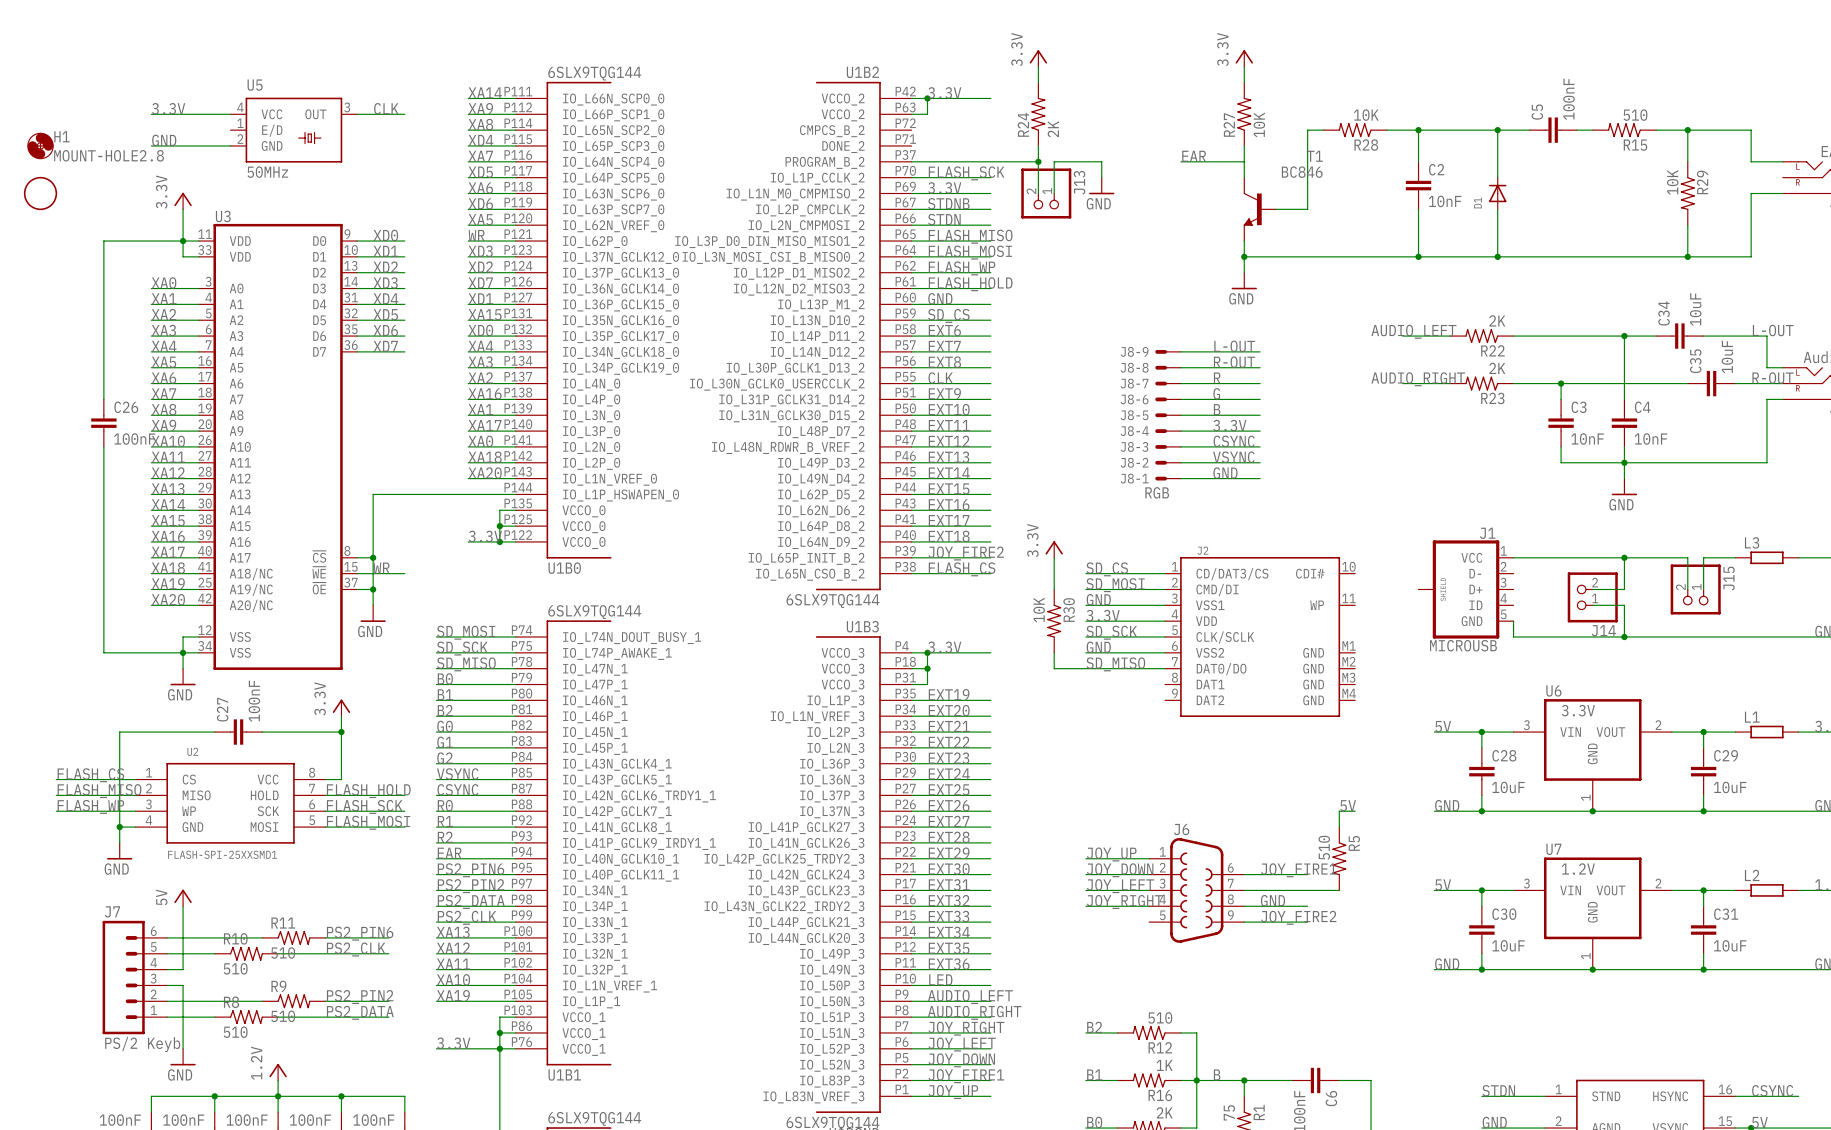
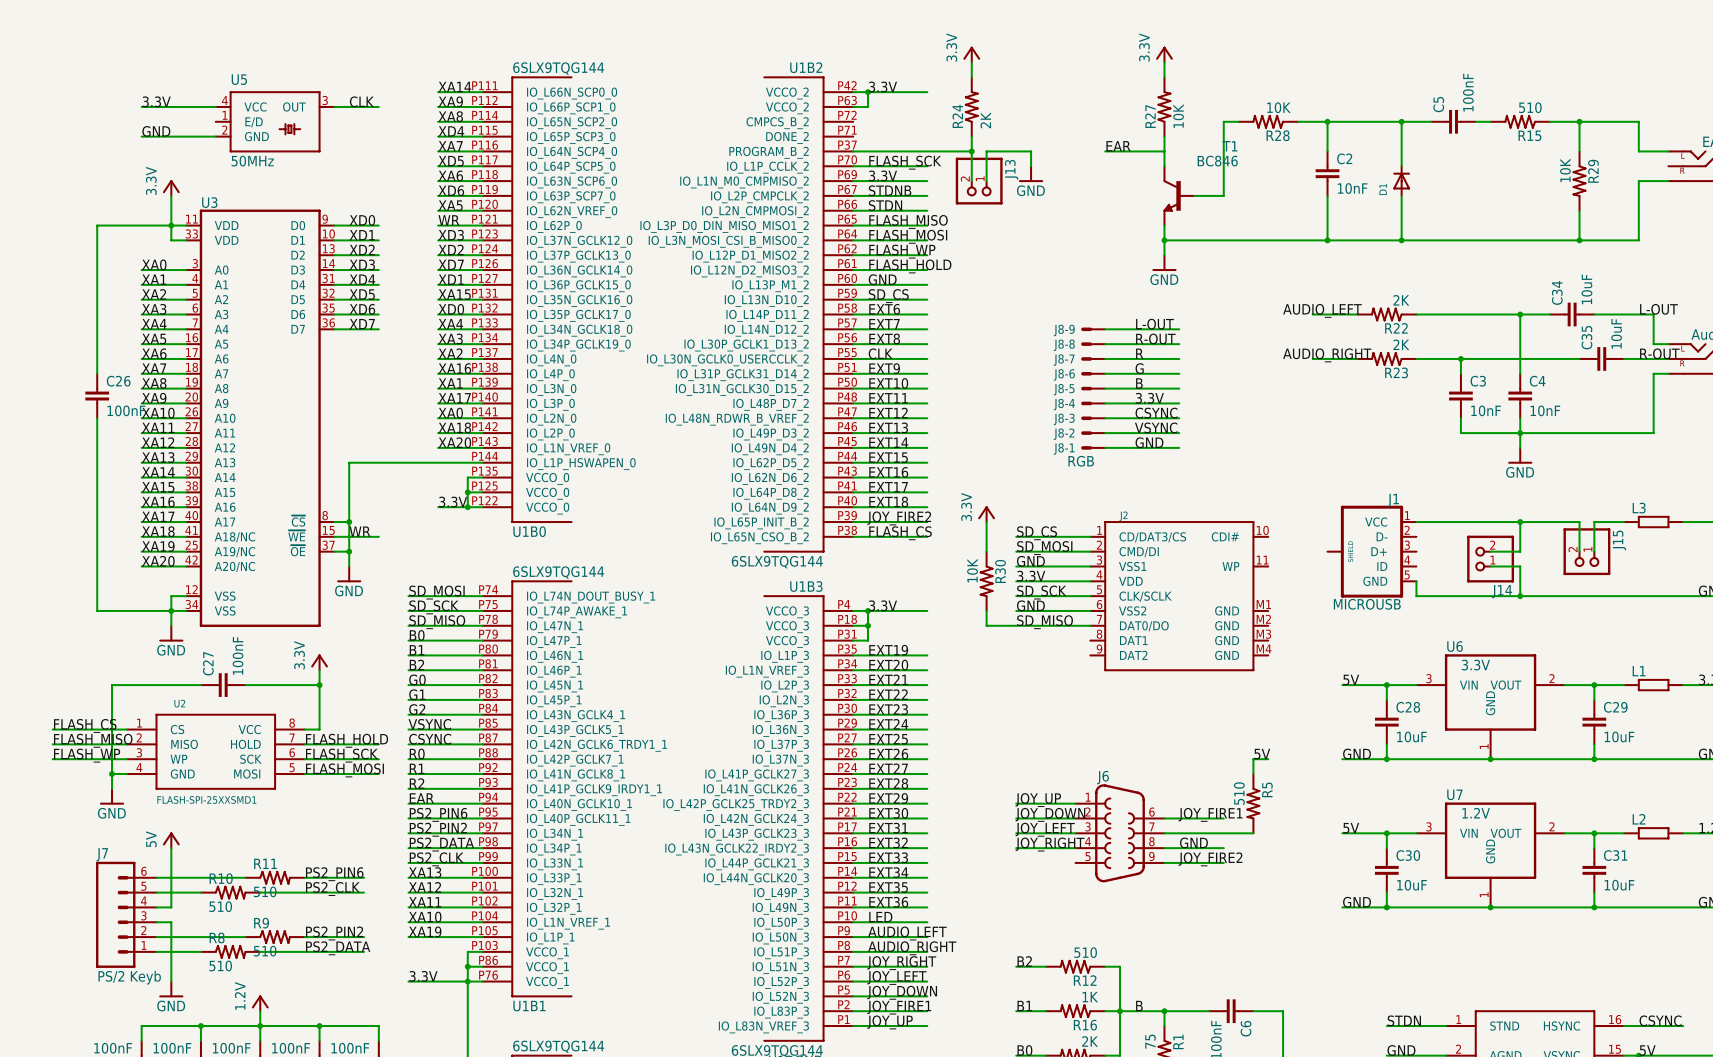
H1: MOUNT-HOLE2.8 (40, 145) -> none
part: (40, 193) -> none

